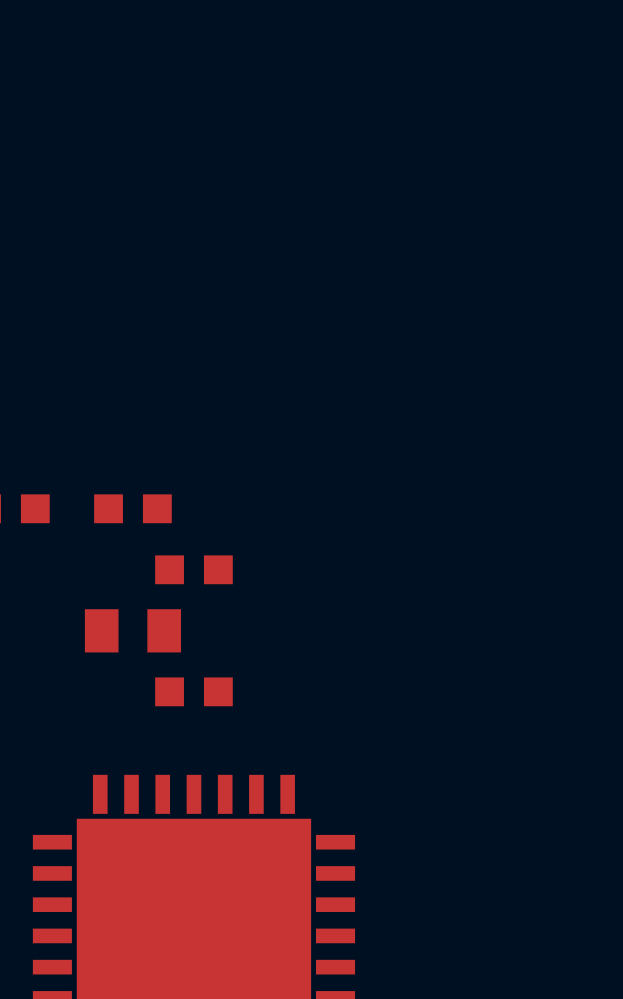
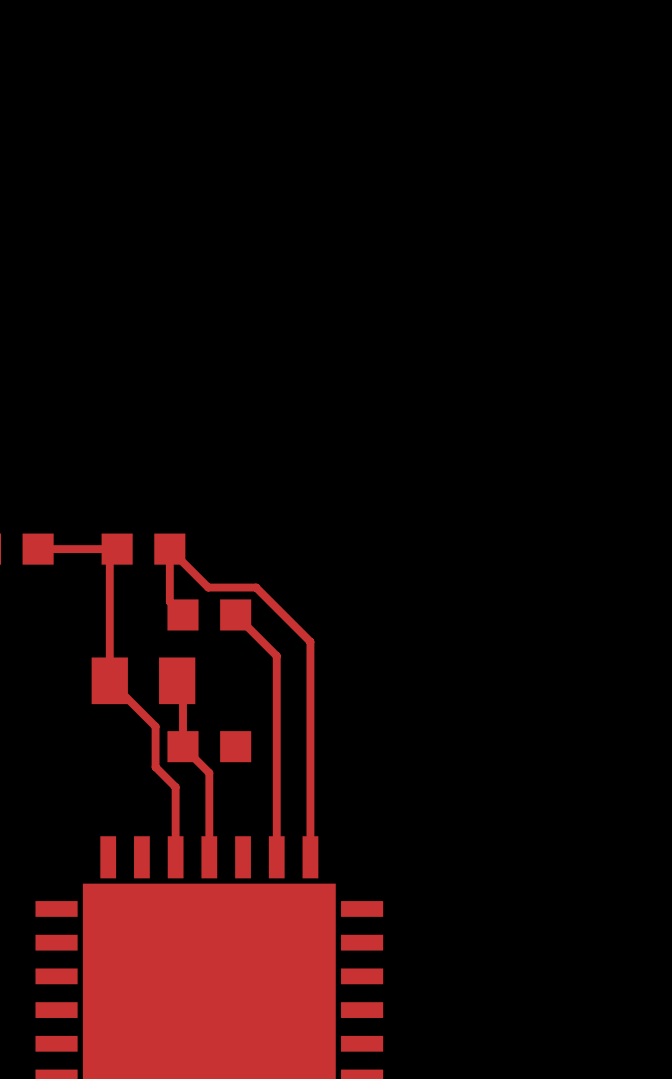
top track: none -> (38, 549) (117, 549) (109, 556) (109, 680) (155, 726) (155, 767) (175, 787) (175, 857)
top track: none -> (182, 614) (169, 601) (169, 549) (208, 587) (256, 587) (310, 641) (310, 857)
top track: none -> (235, 614) (276, 656) (276, 857)
top track: none -> (177, 680) (182, 686) (182, 746) (209, 773) (209, 857)

